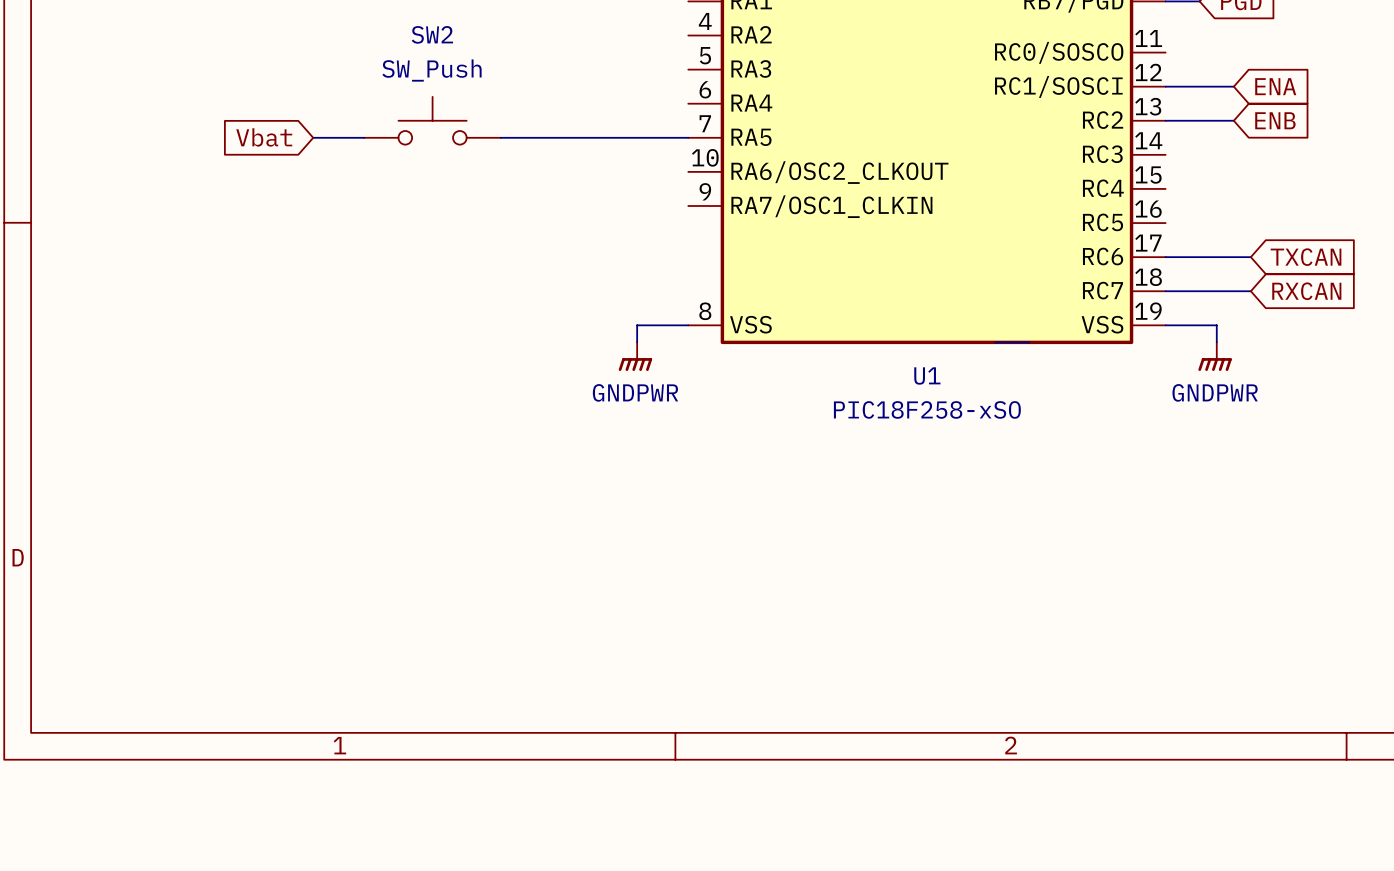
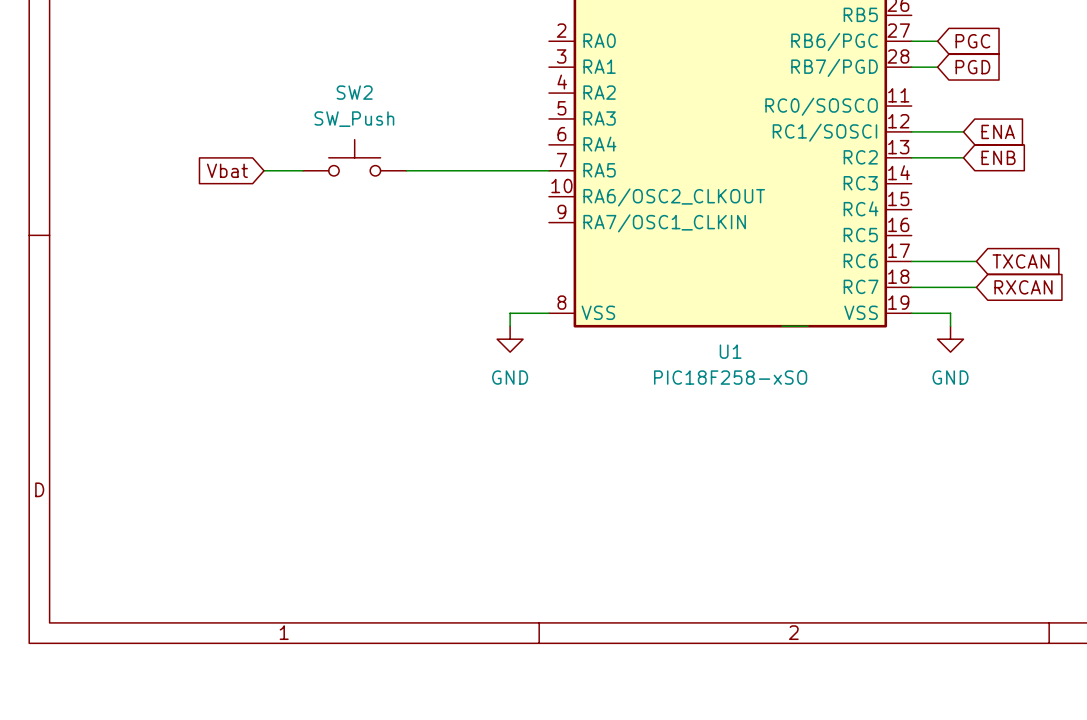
power symbol: GNDPWR (635, 356) -> GND (510, 339)
power symbol: GNDPWR (1215, 356) -> GND (950, 339)

